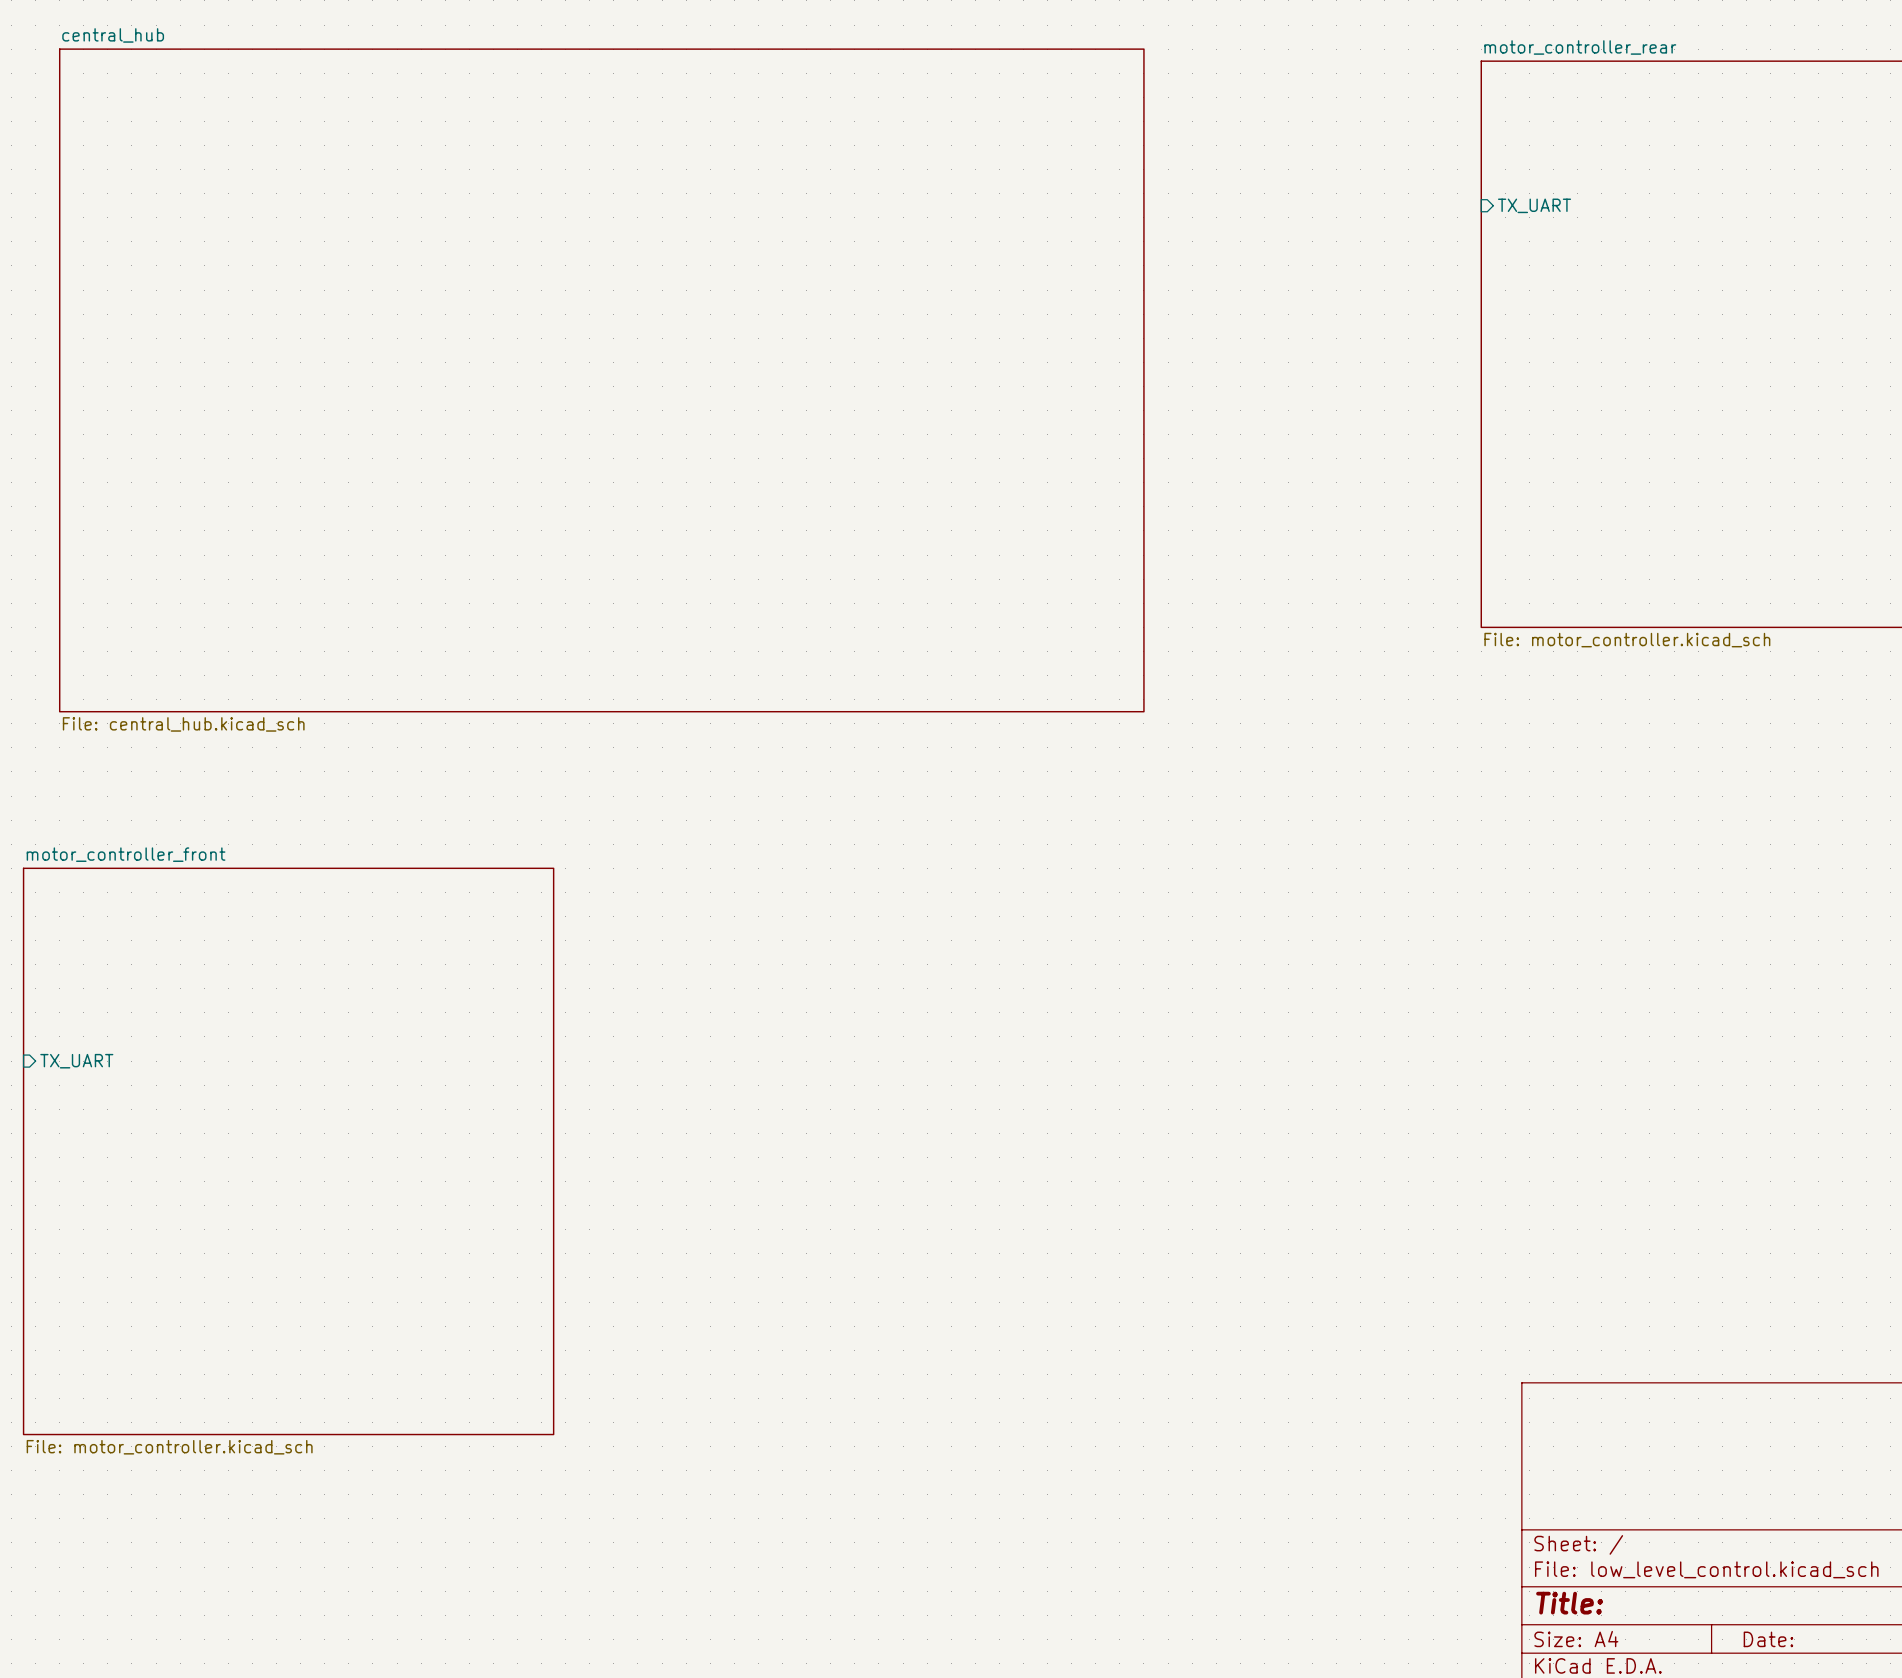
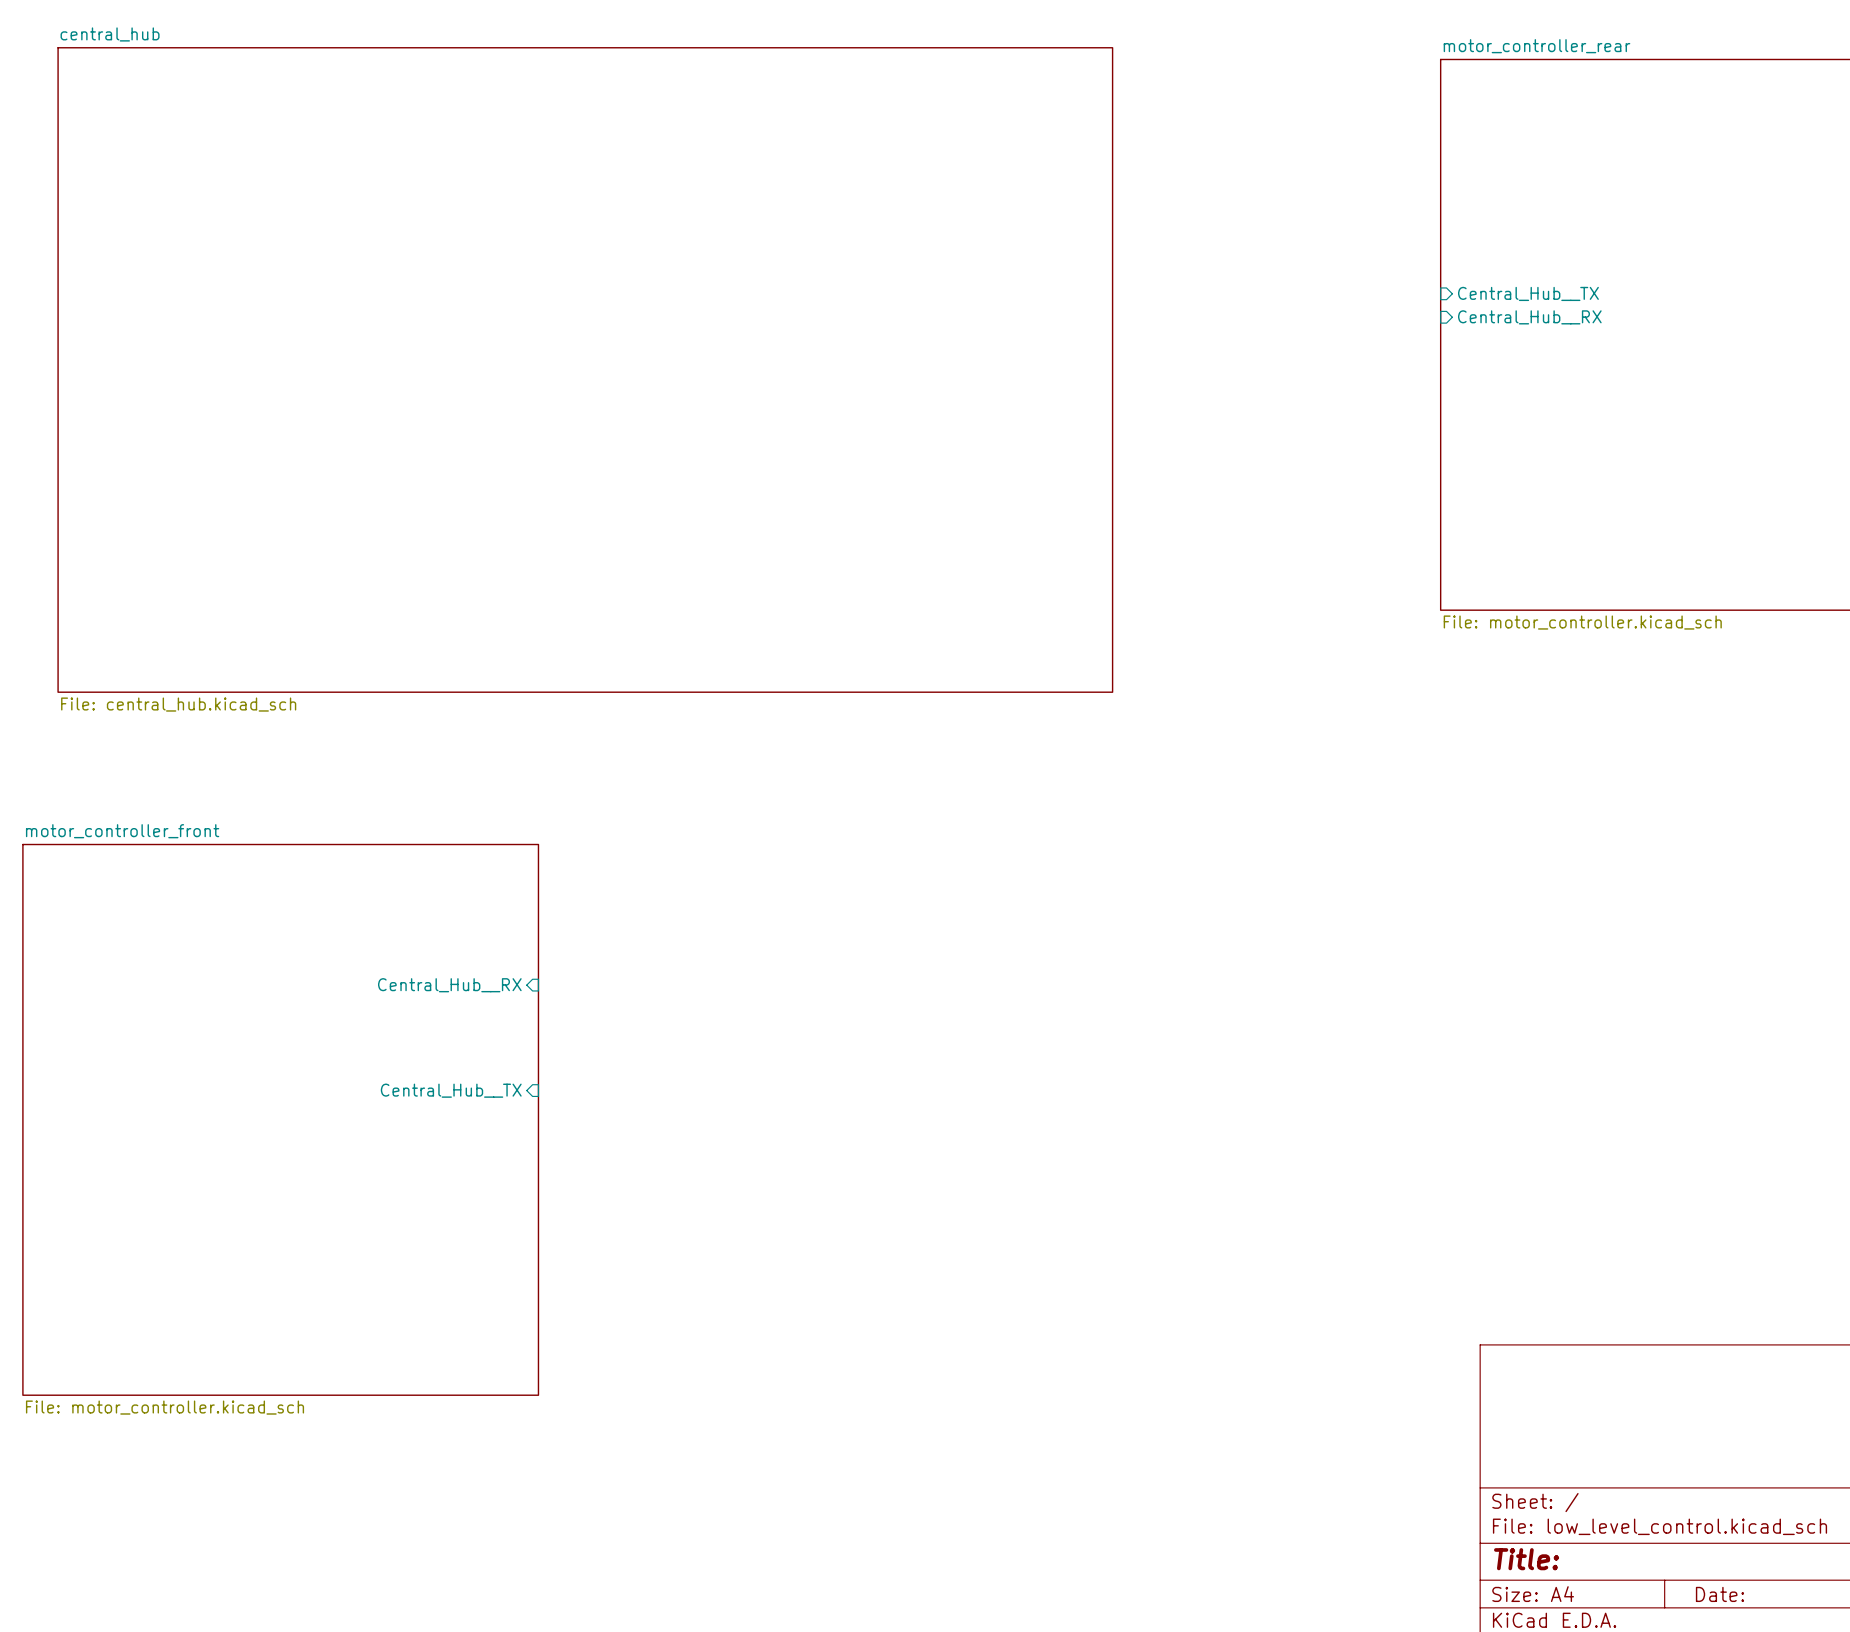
sheet pin: TX_UART (1534, 205) -> none
sheet pin: none -> Central_Hub__TX (1528, 293)
sheet pin: none -> Central_Hub__RX (1529, 317)
sheet pin: none -> Central_Hub__RX (449, 985)
sheet pin: TX_UART (76, 1061) -> none
sheet pin: none -> Central_Hub__TX (451, 1090)

